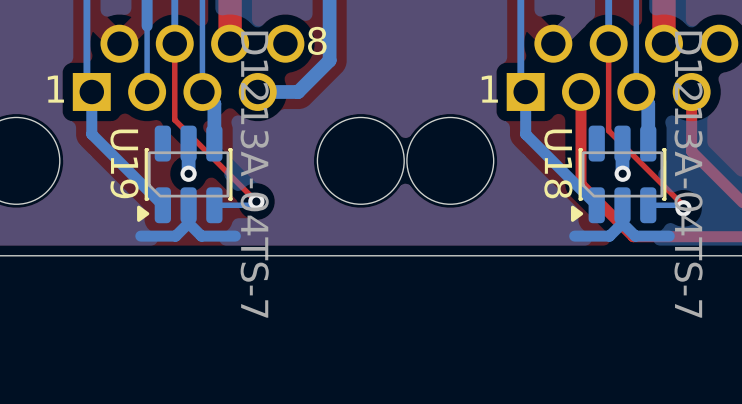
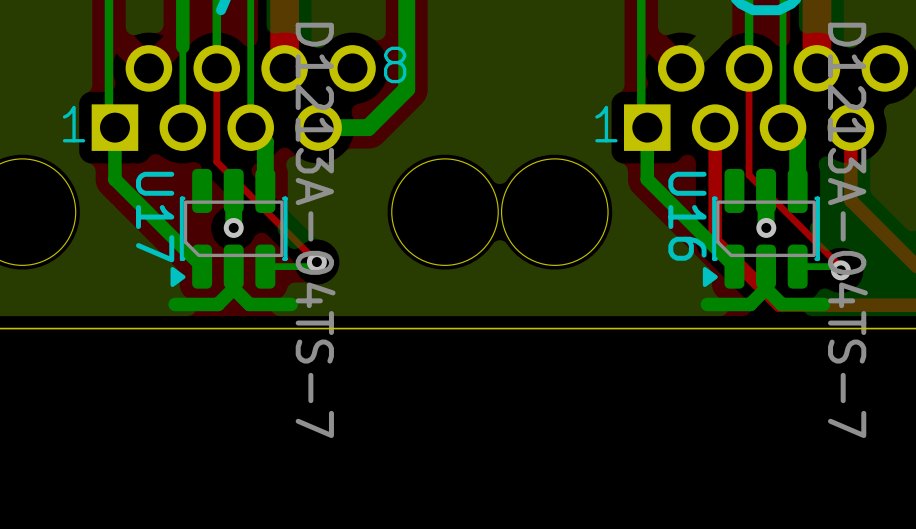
U19 name: U19 (124, 163) -> U17 (155, 217)
U18 name: U18 (558, 163) -> U16 (687, 216)

